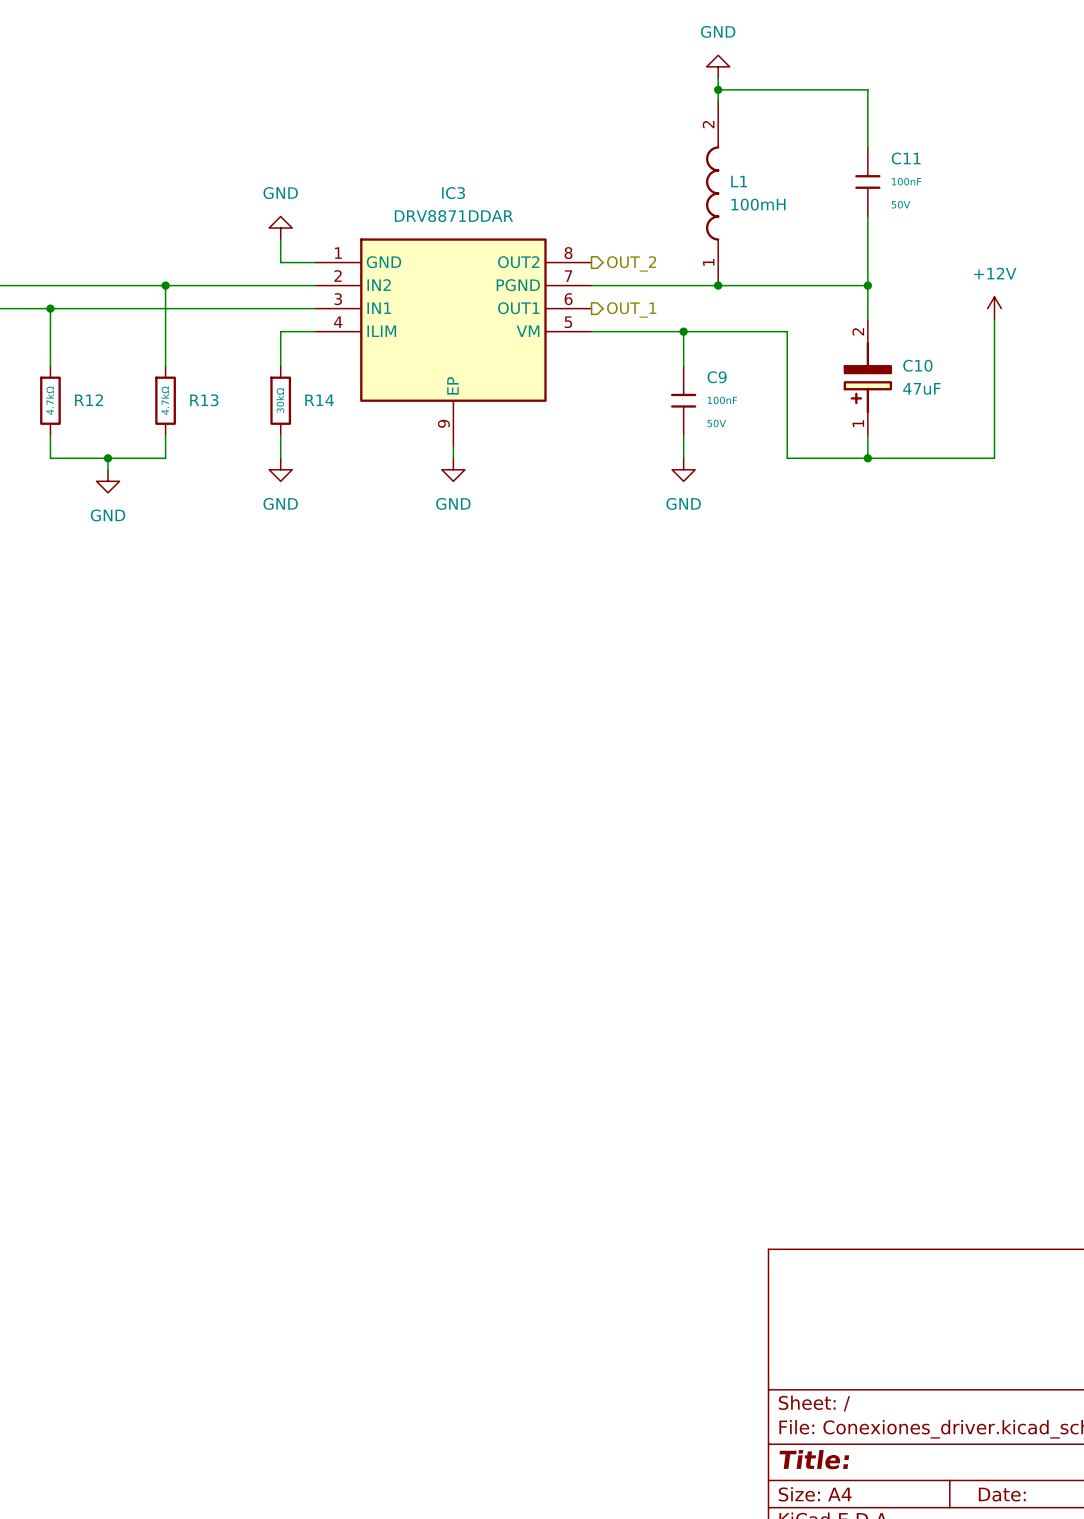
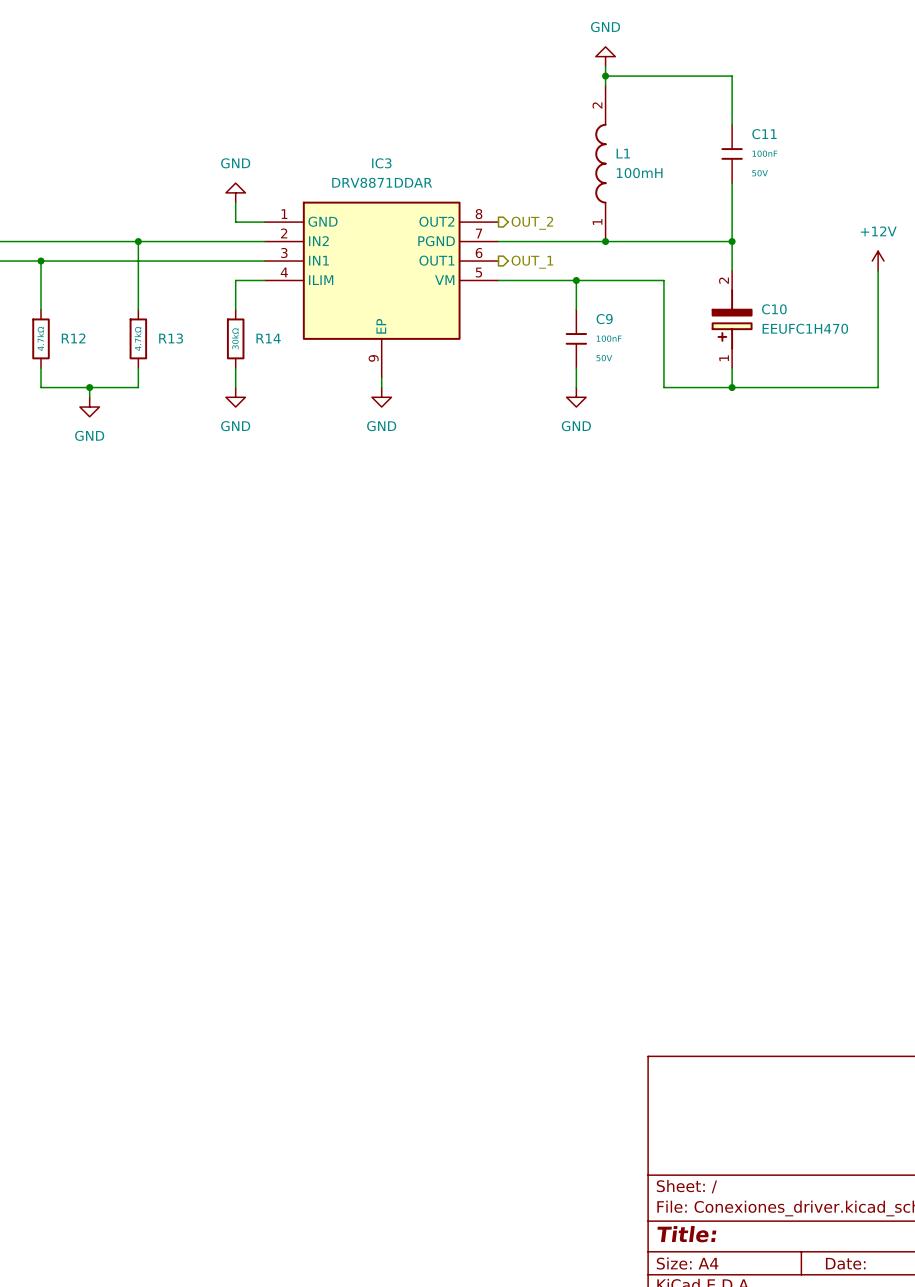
power symbol position: +12V (994, 308) -> +12V (878, 261)
wire: (994, 320) (994, 458) -> (878, 270) (878, 387) (839, 387)
C10 value: 47uF (921, 388) -> EEUFC1H470 (805, 328)

